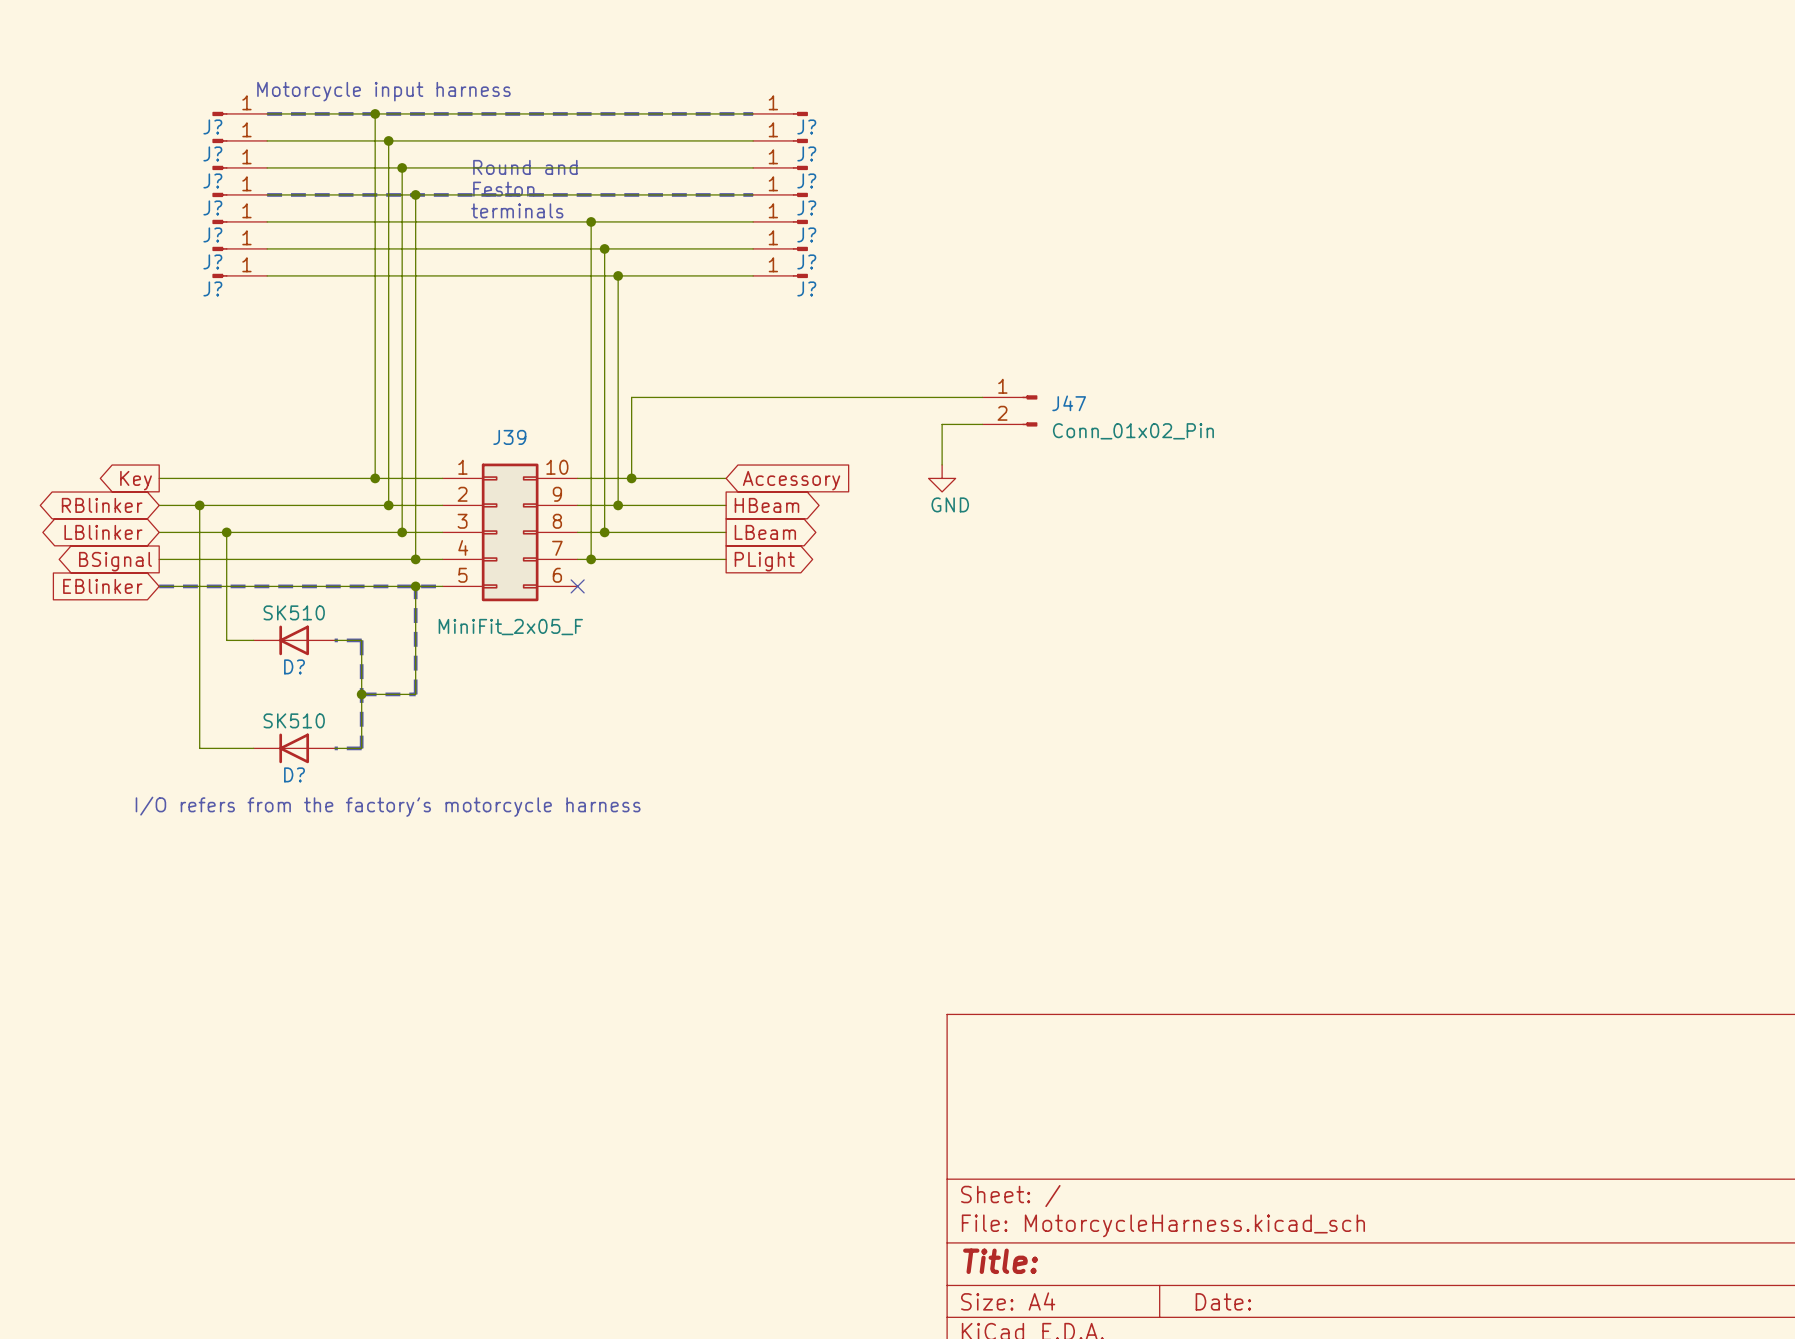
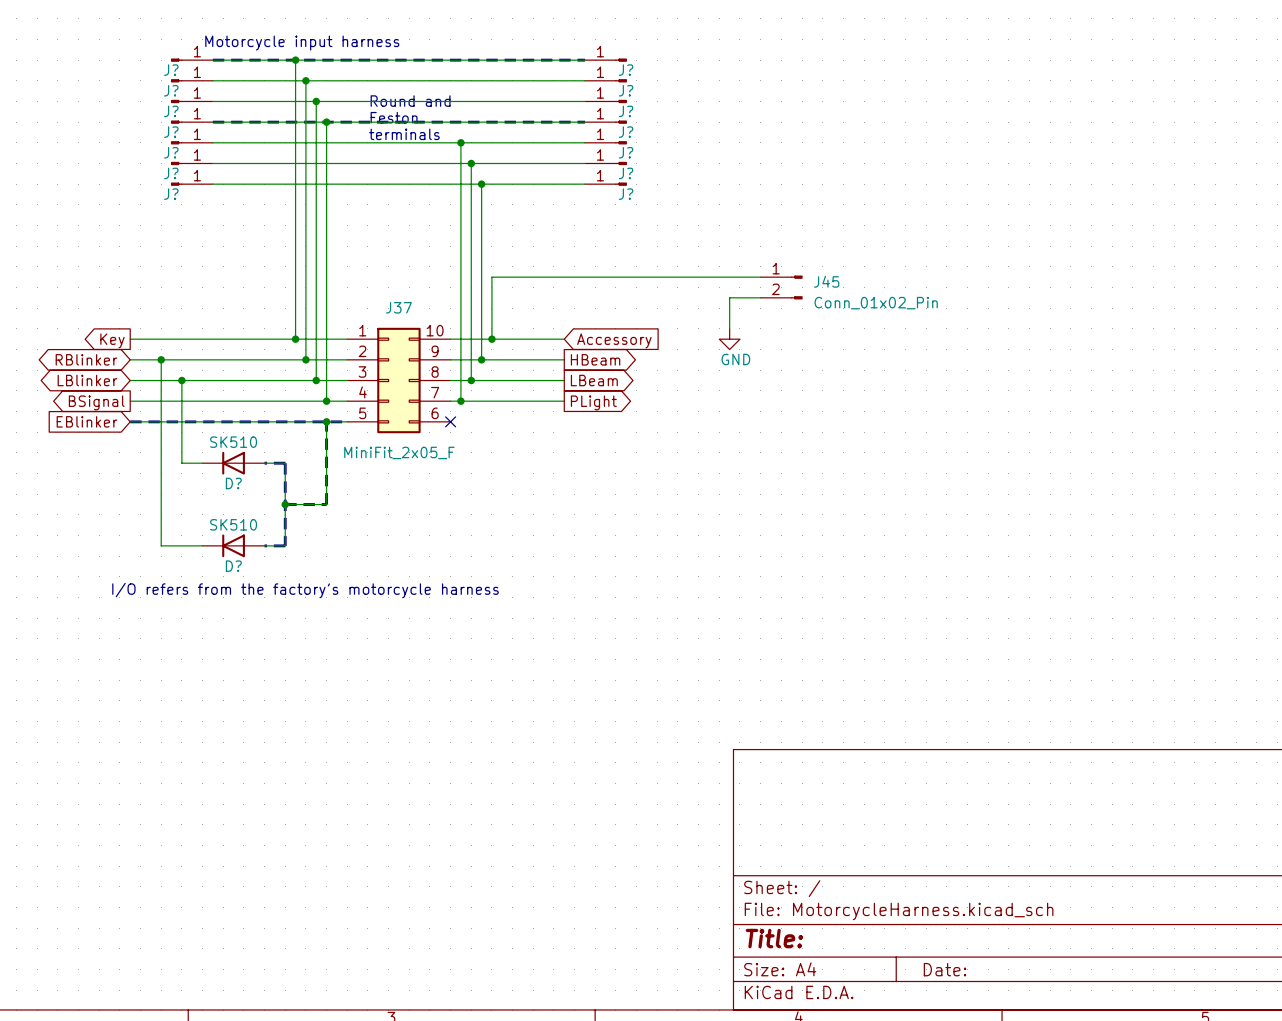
J47 name: J47 (1069, 403) -> J45 (826, 281)
J39 name: J39 (509, 437) -> J37 (398, 307)

